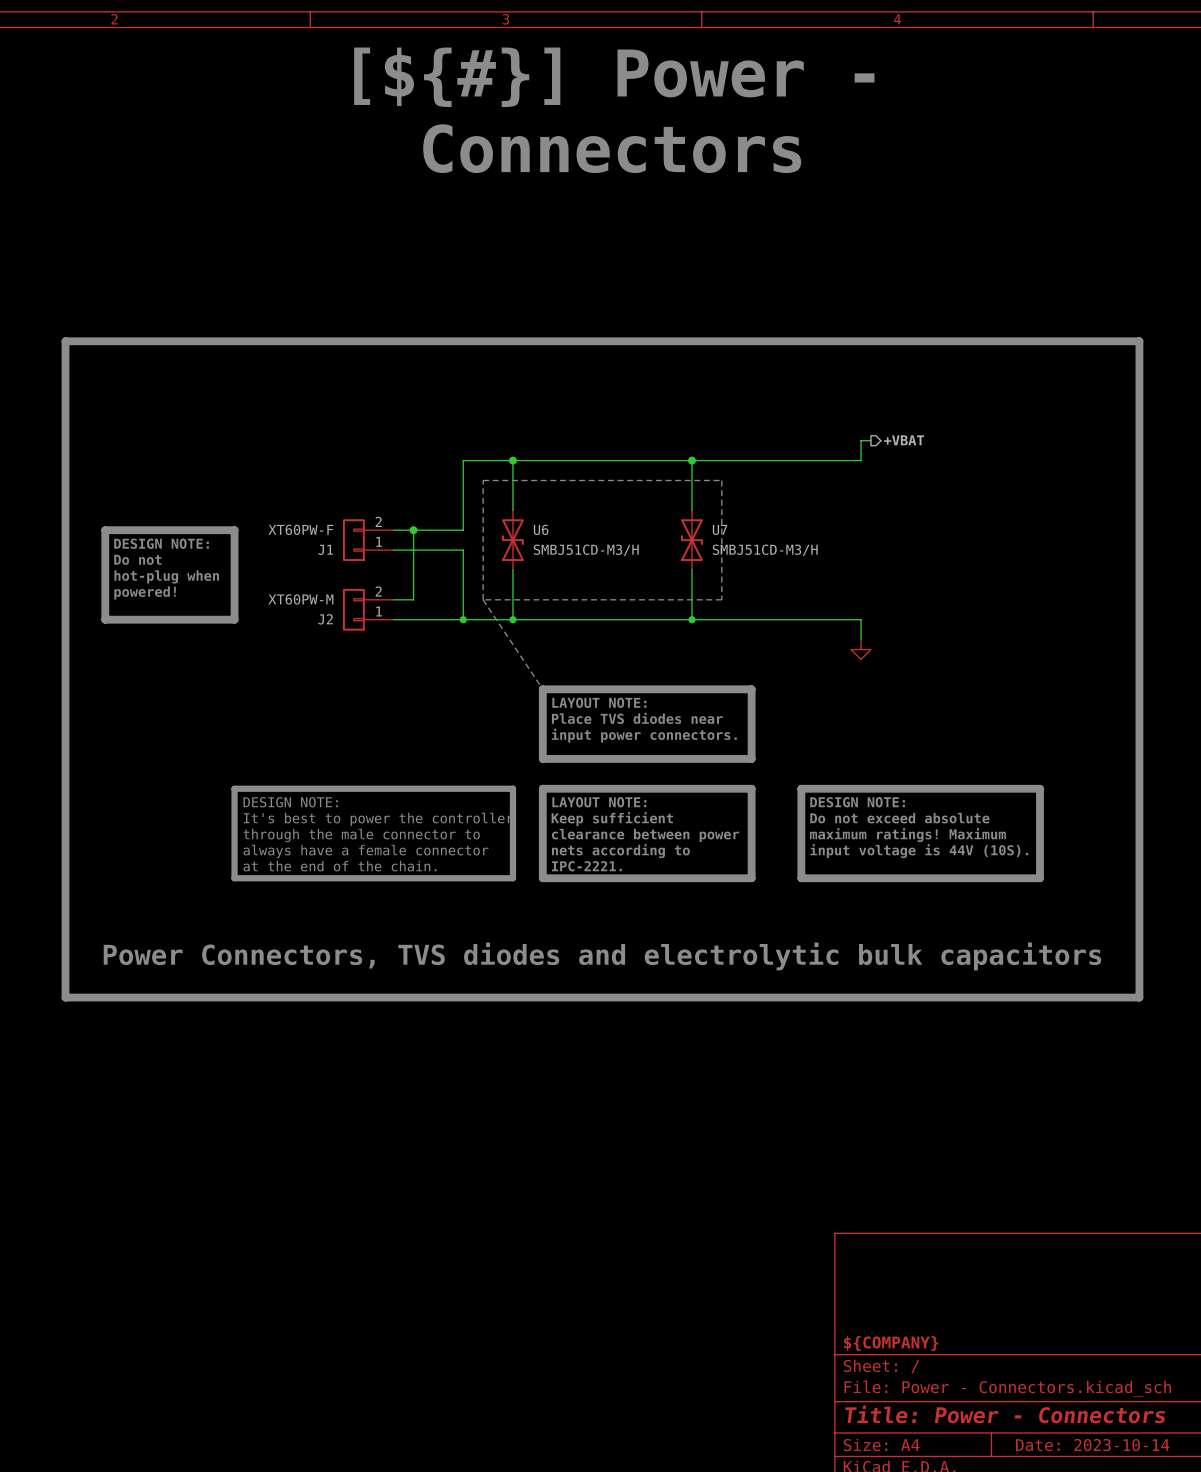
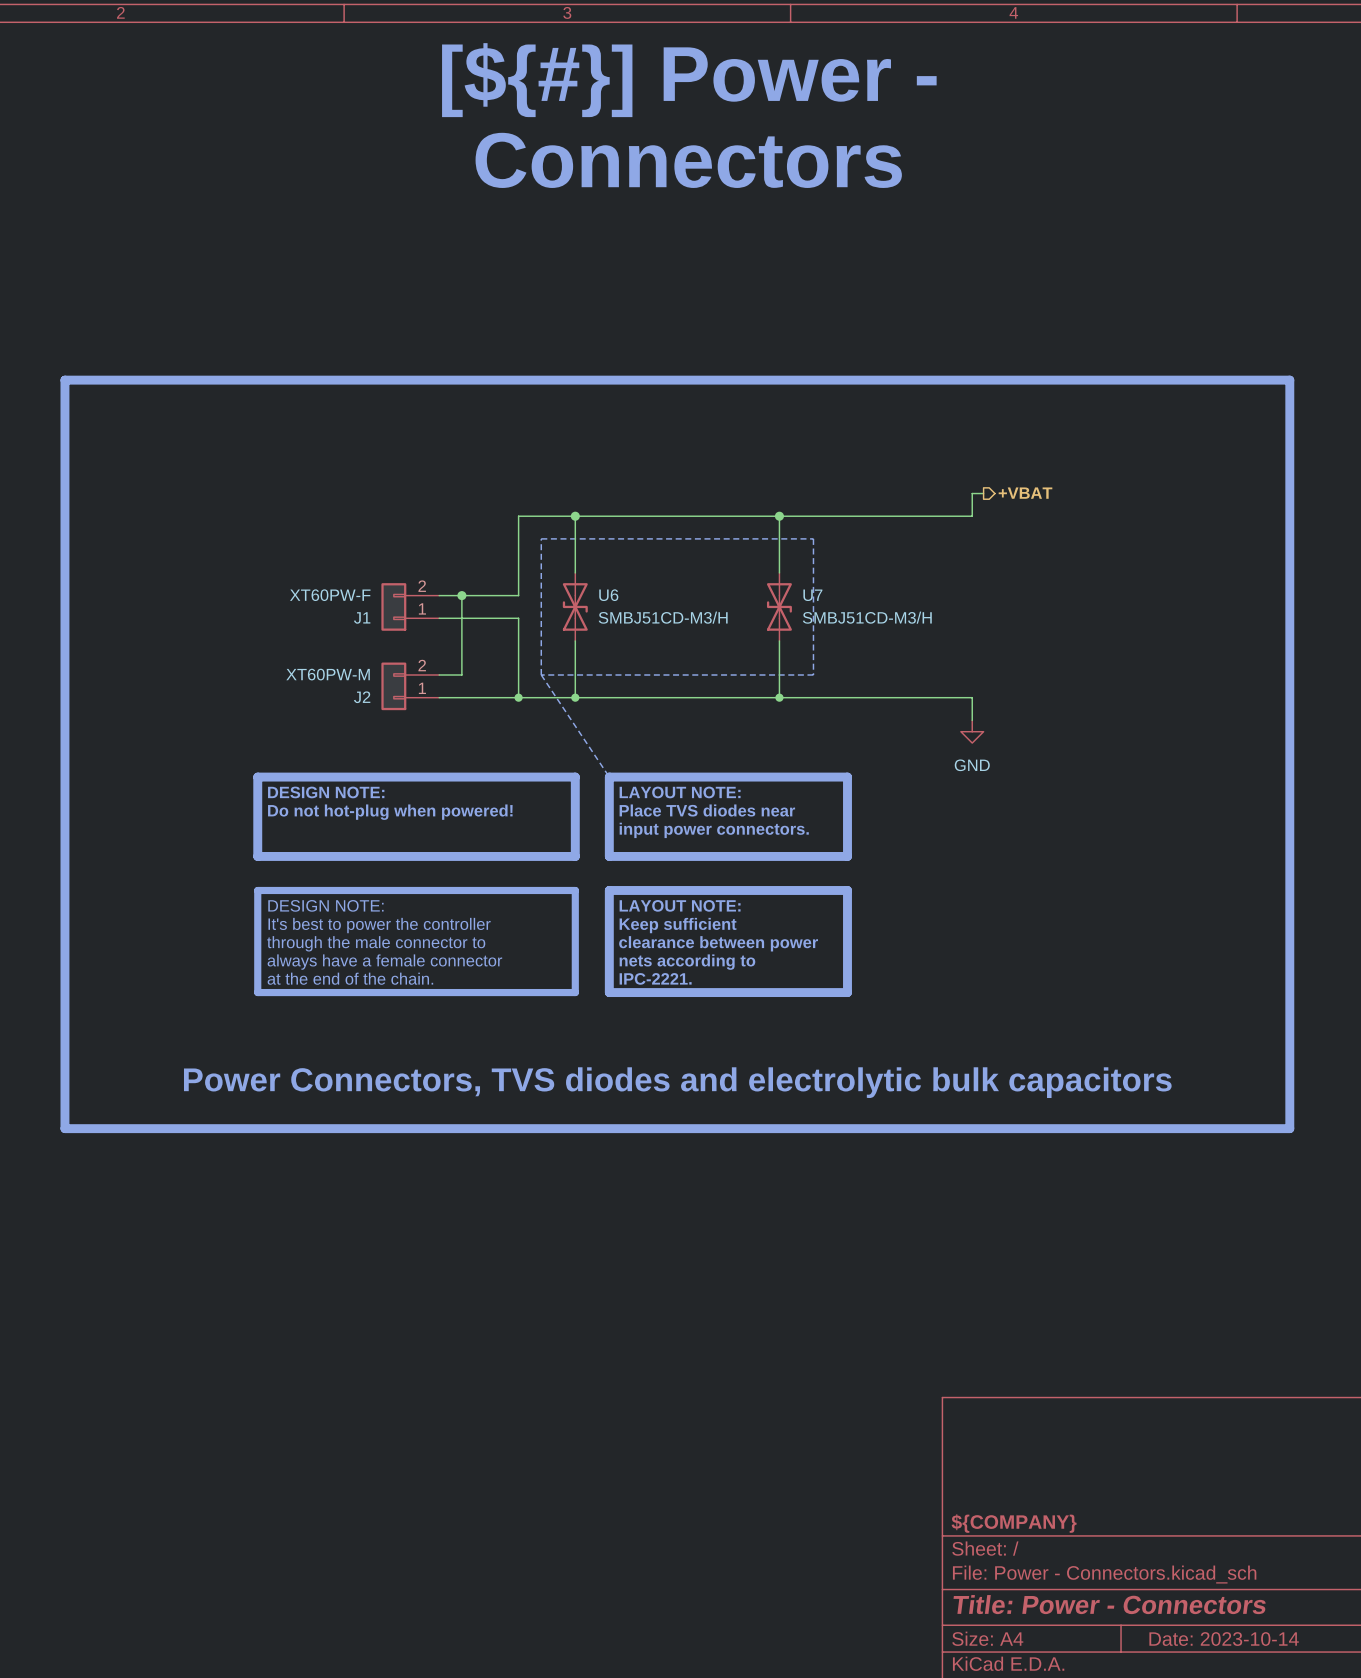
line: (105, 530) (234, 530) (234, 619) (105, 619) (105, 530) -> none
text: DESIGN NOTE: (161, 543) -> none
text: Do not (137, 559) -> none
text: hot-plug when (166, 576) -> none
text: powered! (145, 592) -> none
power symbol text: none -> GND (972, 765)
line: none -> (257, 777) (575, 777) (575, 856) (257, 856) (257, 777)
text: none -> DESIGN NOTE: (326, 792)
text: none -> Do not hot-plug when powered! (390, 812)
line: (801, 788) (1040, 788) (1040, 878) (801, 878) (801, 788) -> none
text: DESIGN NOTE: (857, 802) -> none
text: Do not exceed absolute (899, 818) -> none
text: maximum ratings! Maximum (907, 835) -> none
text: input voltage is 44V (10S). (919, 851) -> none

